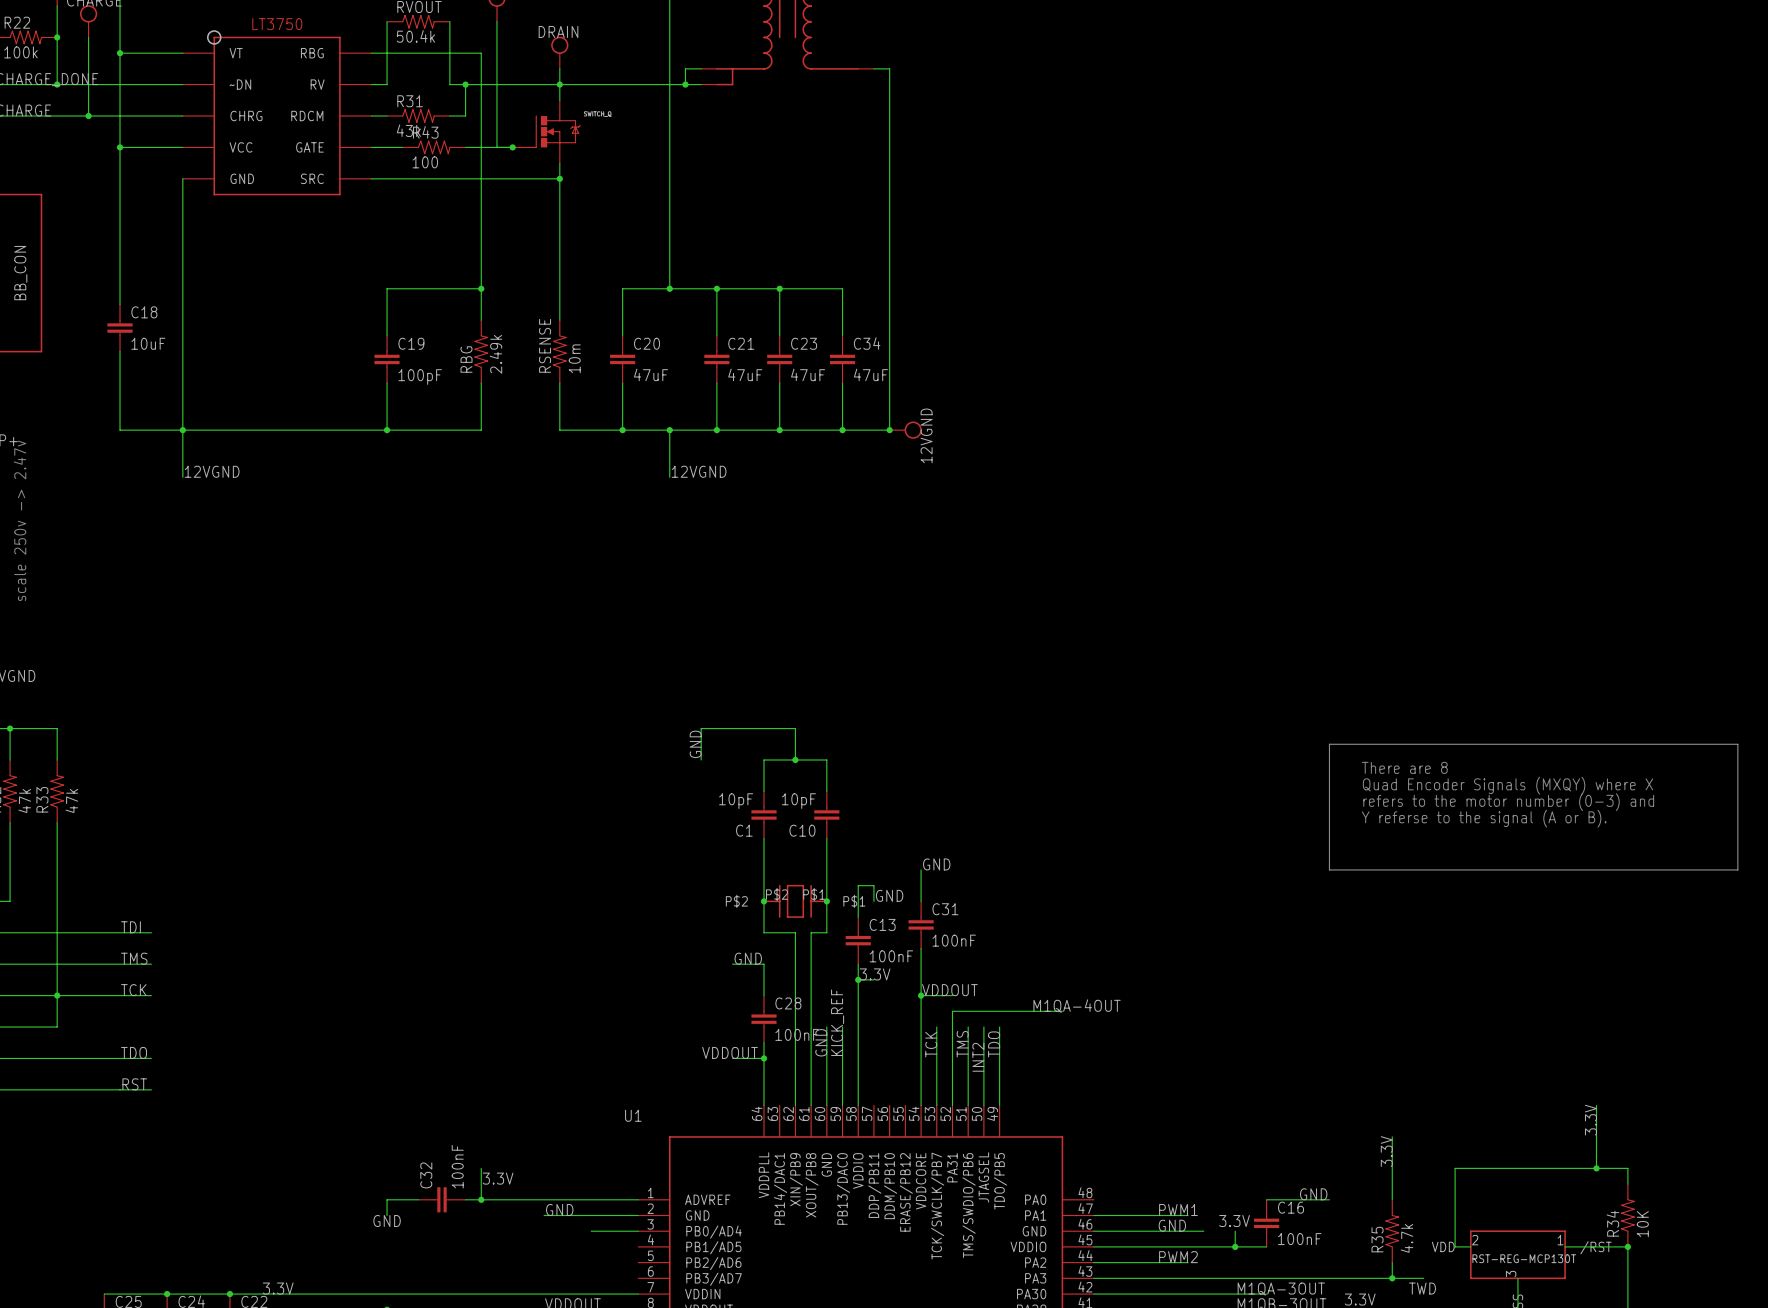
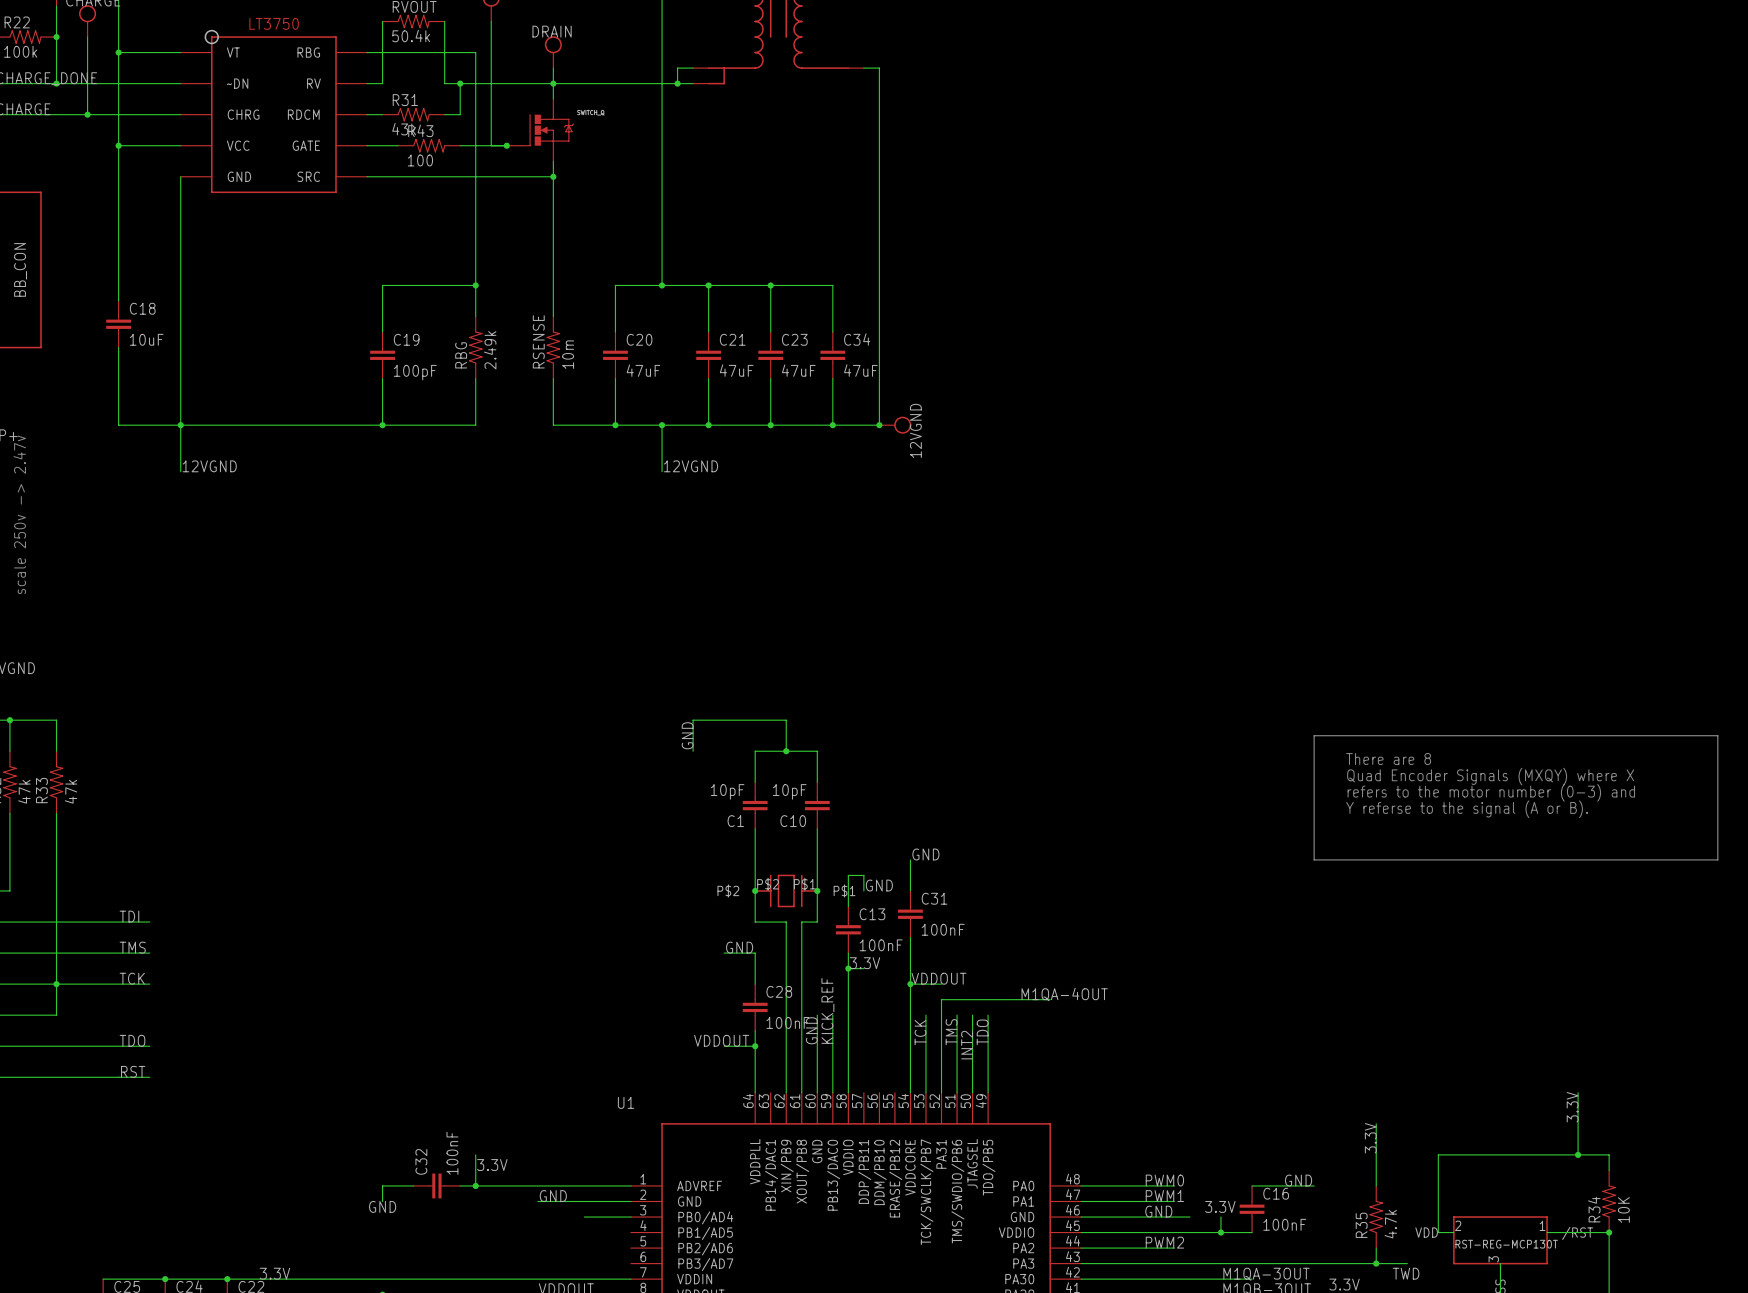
label: none -> PWM0 (1164, 1180)
wire: none -> (1081, 1185) (1174, 1185)

